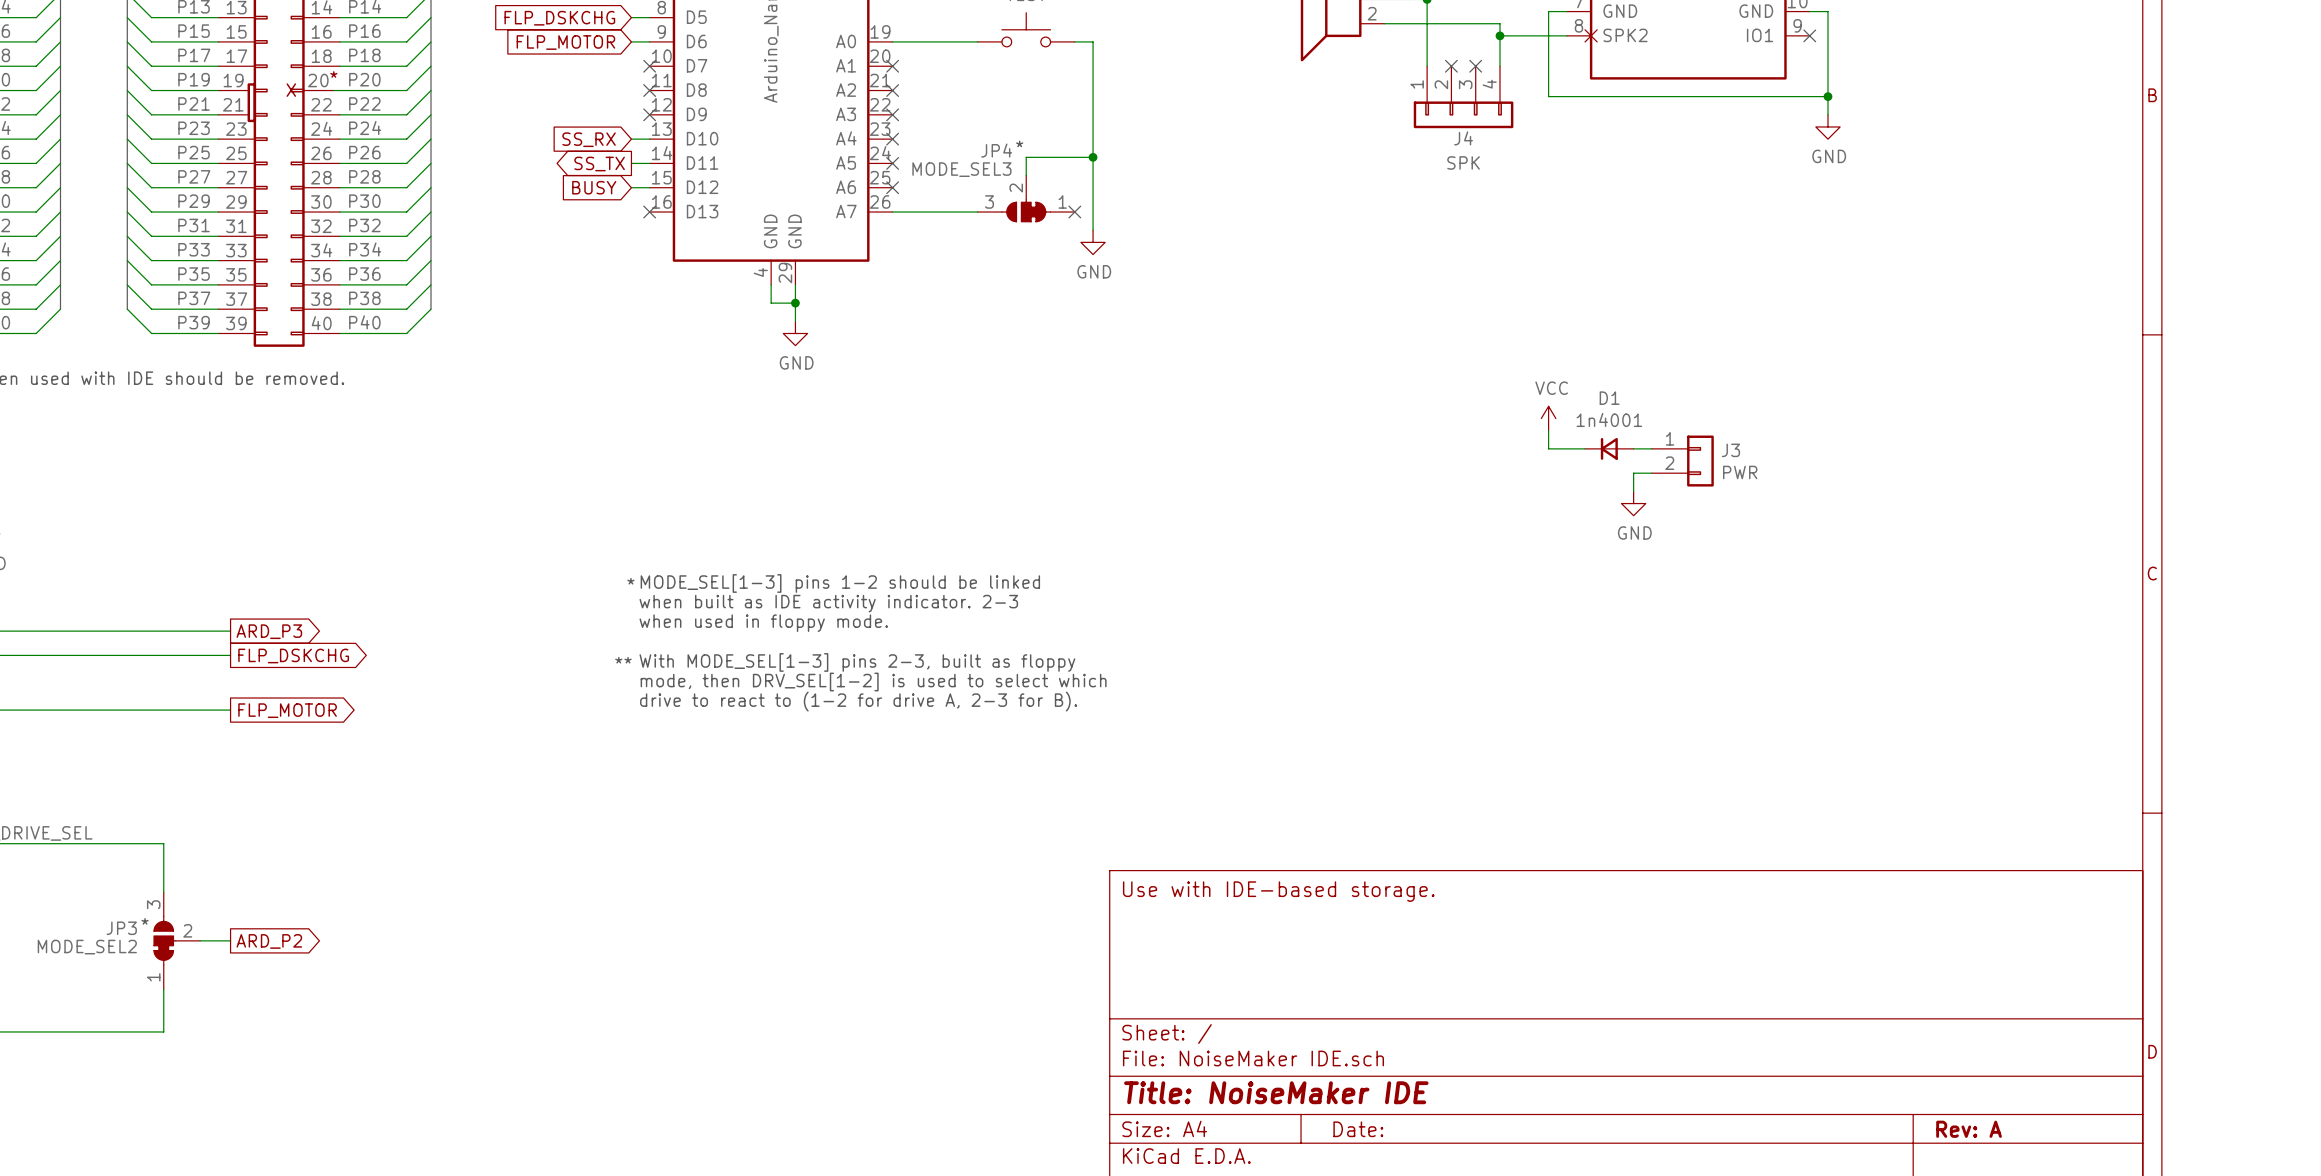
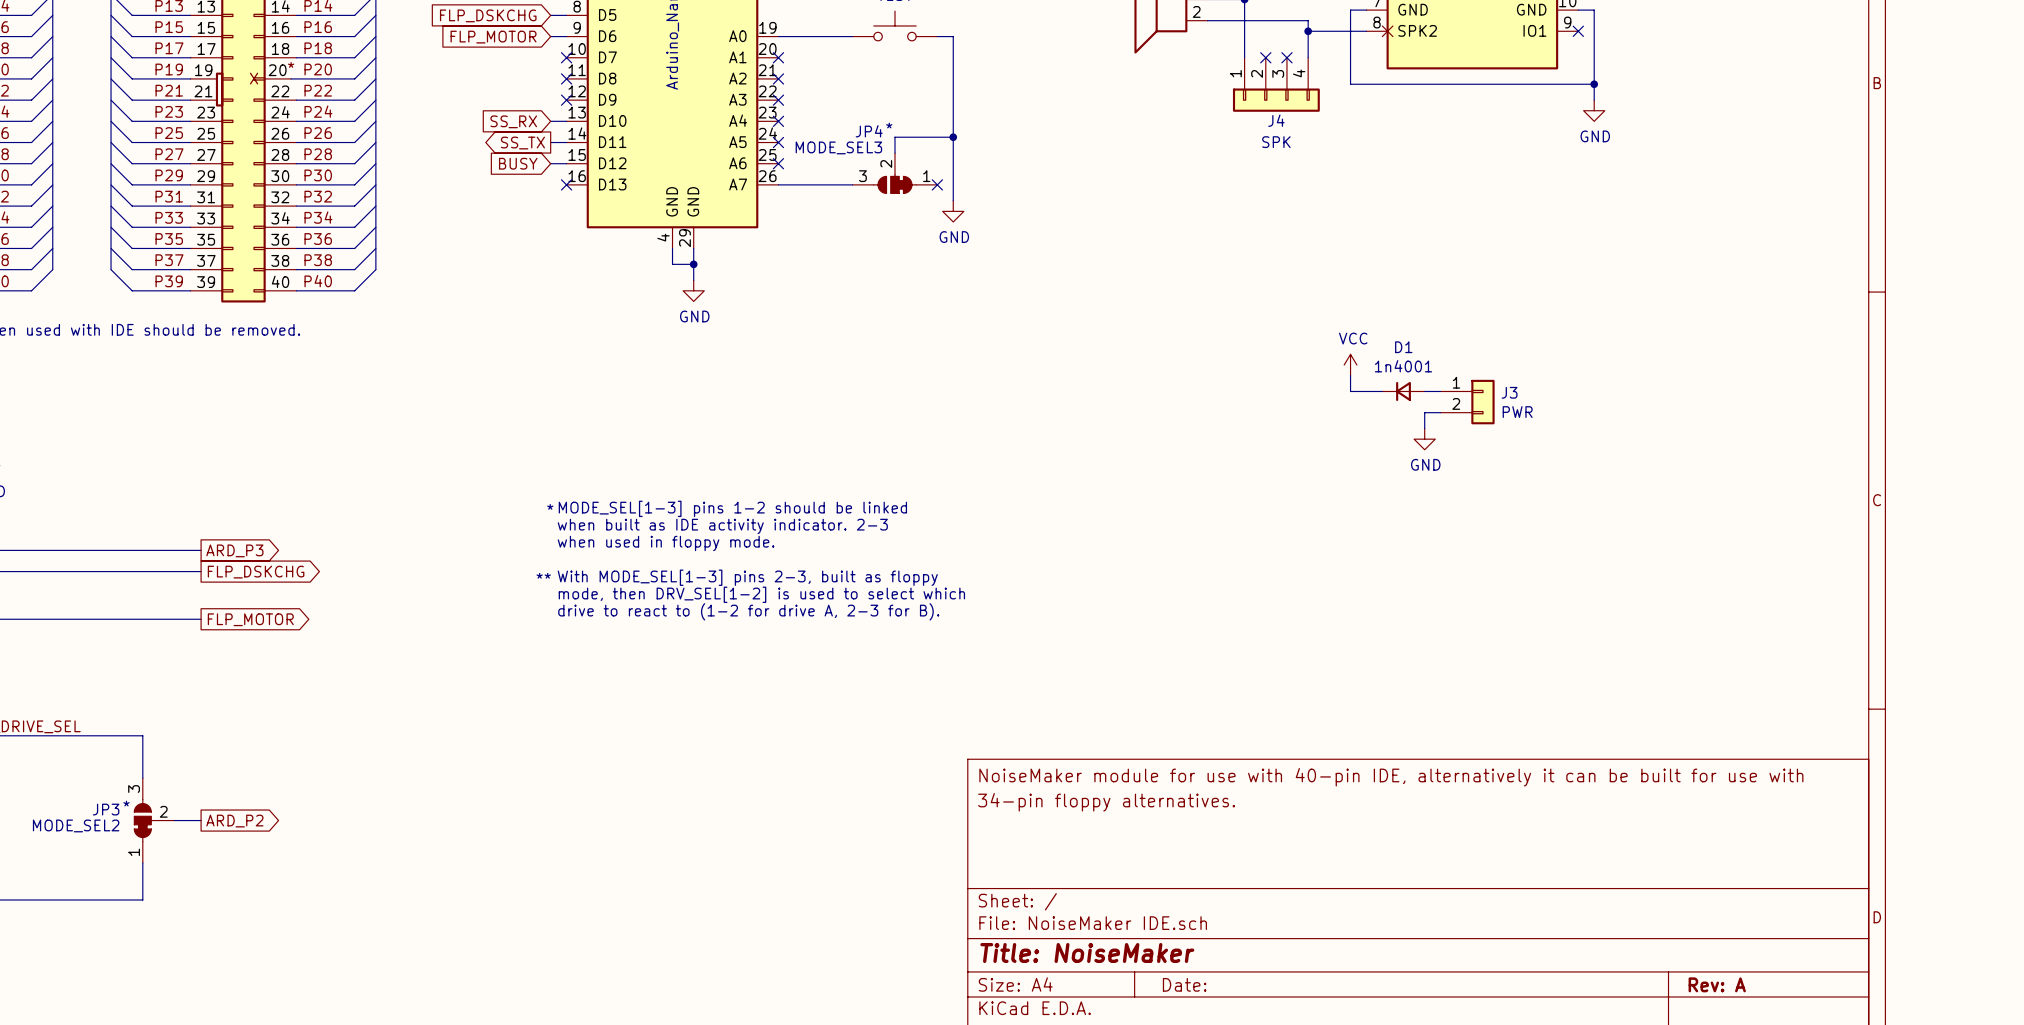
title block: Use with IDE-based storage. (1278, 891) -> NoiseMaker module for use with 40-pin IDE, alternatively it can be built for use with (1391, 777)
title block: none -> 34-pin floppy alternatives. (1106, 802)
title block: Title: NoiseMaker IDE (1276, 1092) -> Title: NoiseMaker (1087, 952)

